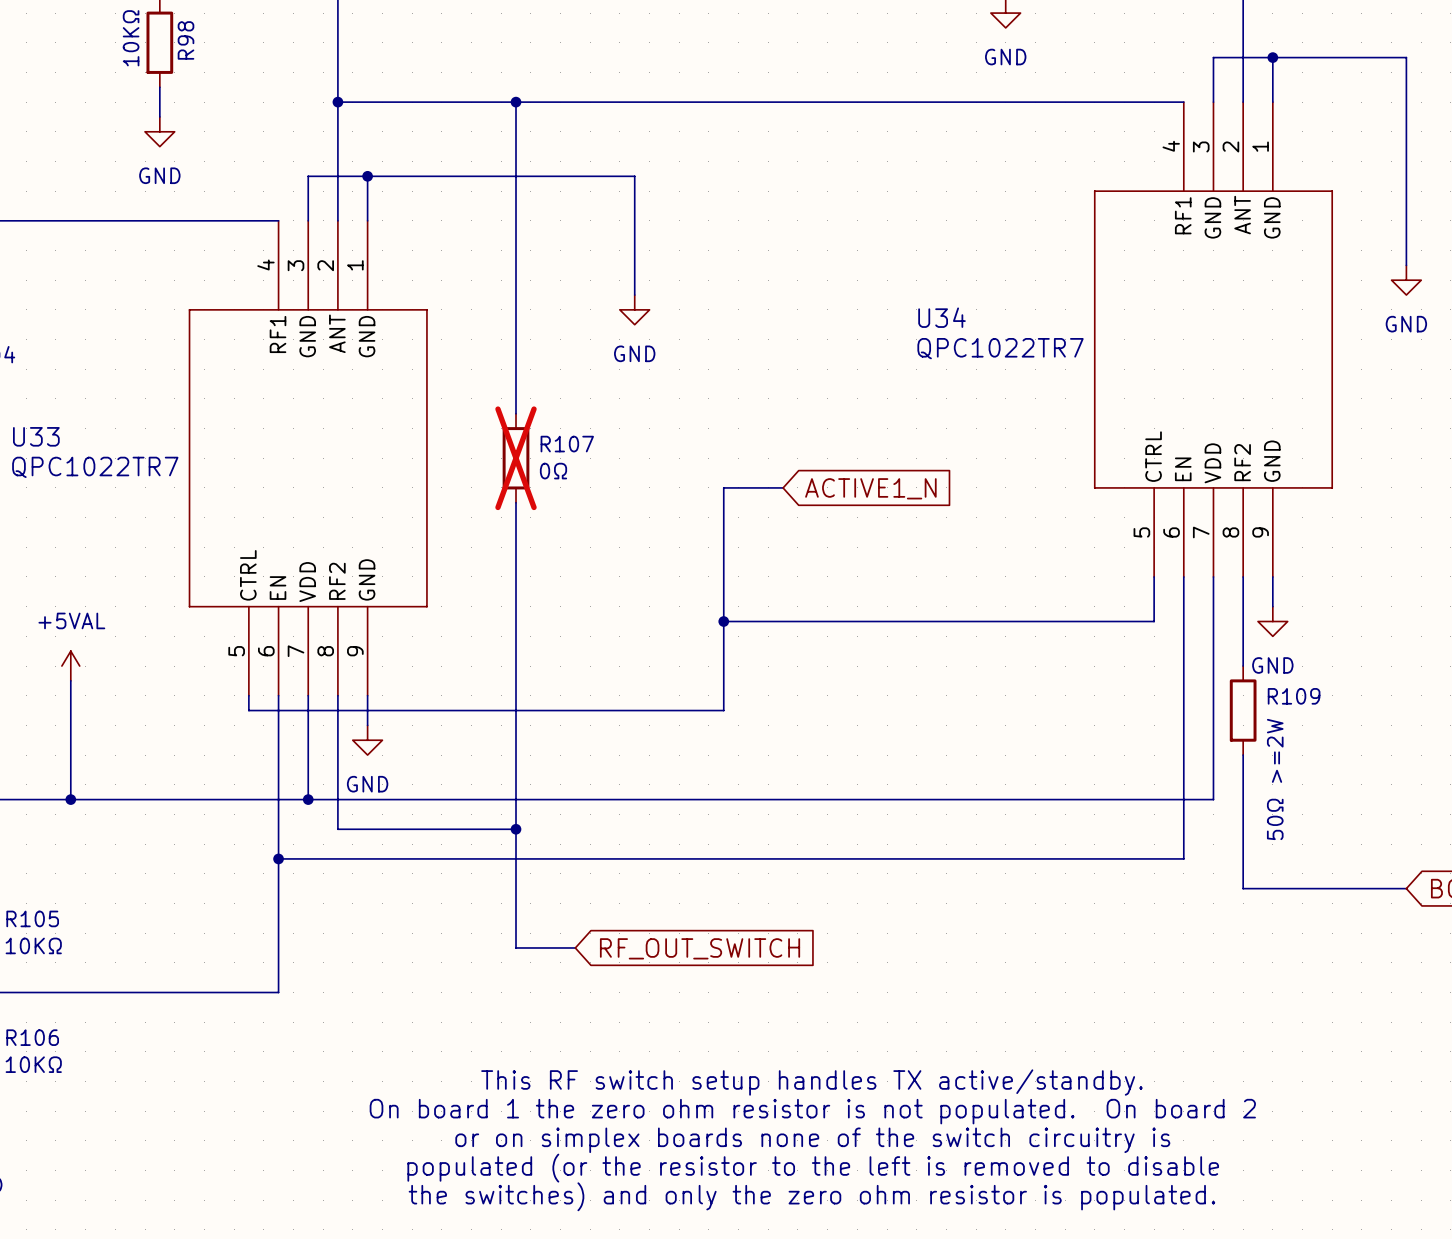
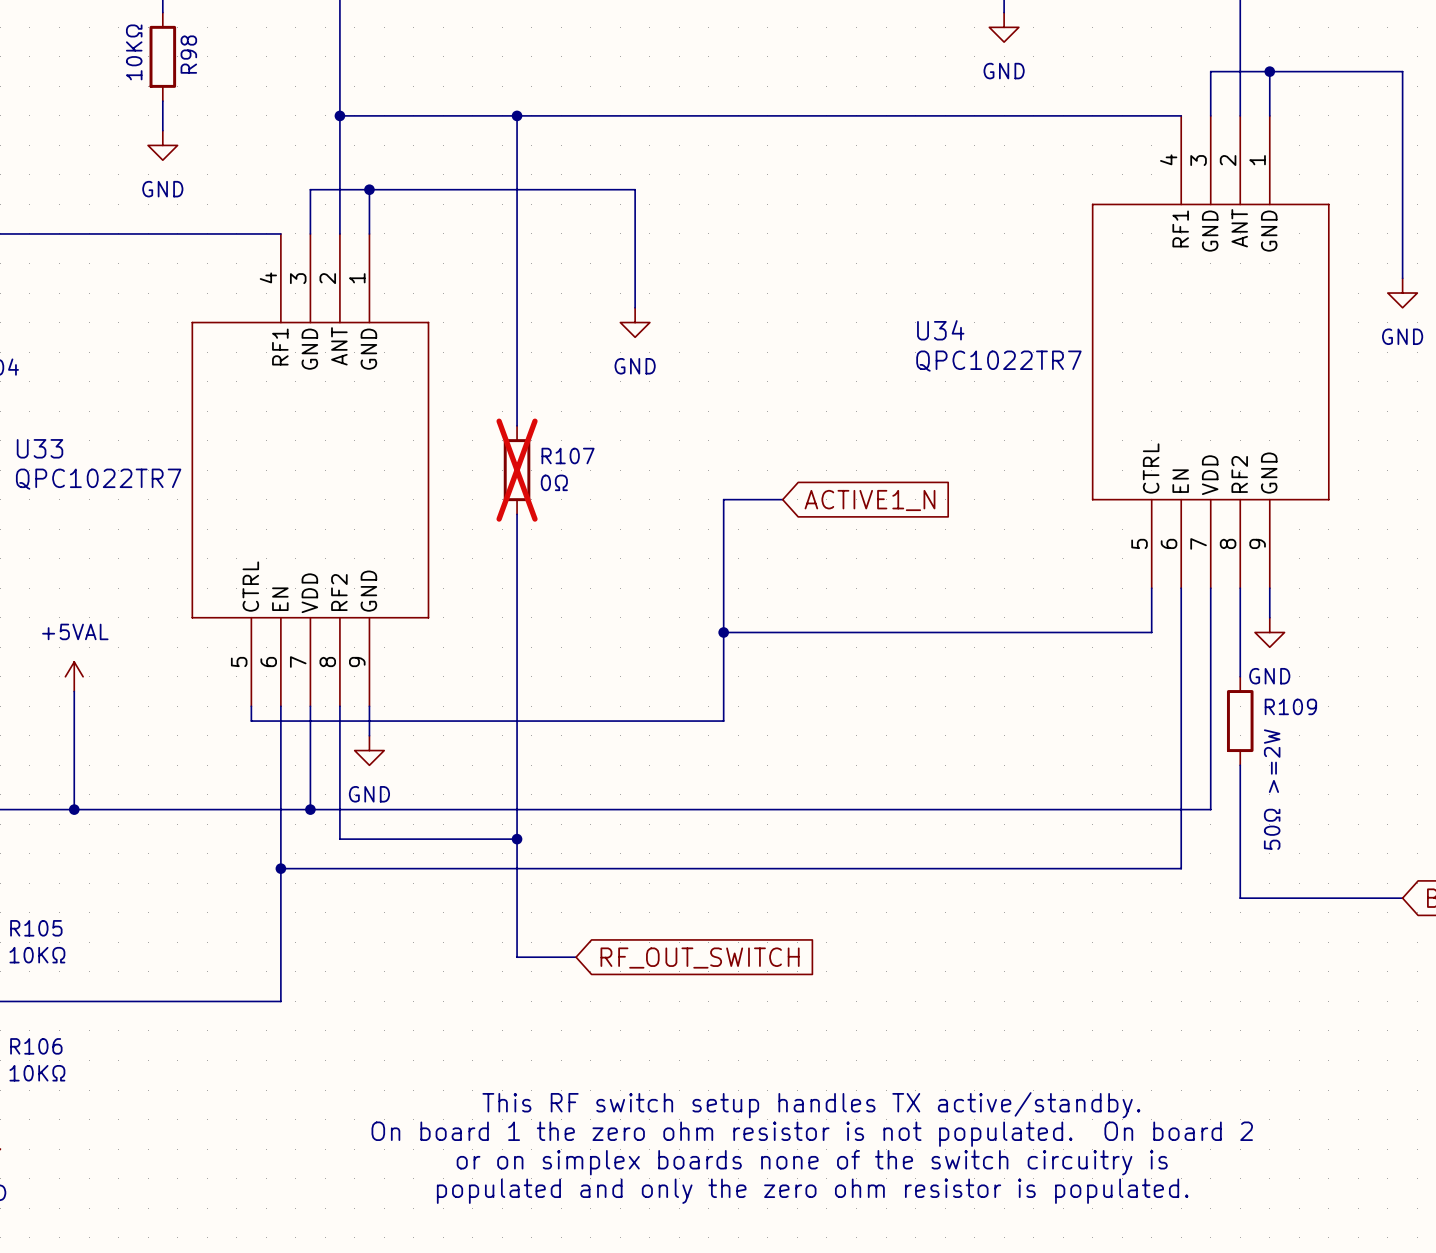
text position: This RF switch setup handles TX active/standby. (811, 1082) -> This RF switch setup handles TX active/standby. (811, 1105)
text position: On board 1 the zero ohm resistor is not populated. On board 2 (812, 1111) -> On board 1 the zero ohm resistor is not populated. On board 2 (812, 1134)
text position: or on simplex boards none of the switch circuitry is (812, 1140) -> or on simplex boards none of the switch circuitry is (812, 1162)
text: populated (or the resistor to the left is removed to disable (813, 1168) -> none
text: the switches) and only the zero ohm resistor is populated. (811, 1196) -> populated and only the zero ohm resistor is populated. (812, 1191)

